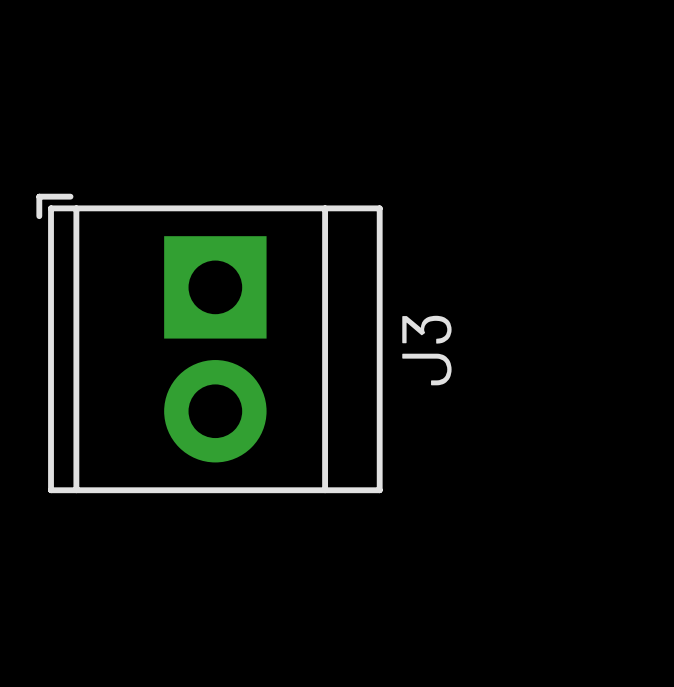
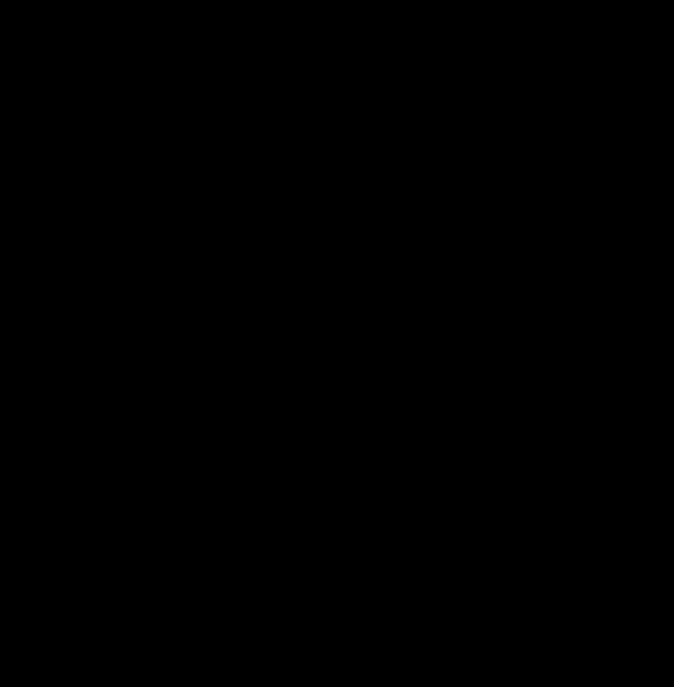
J3: (209, 343) -> none

